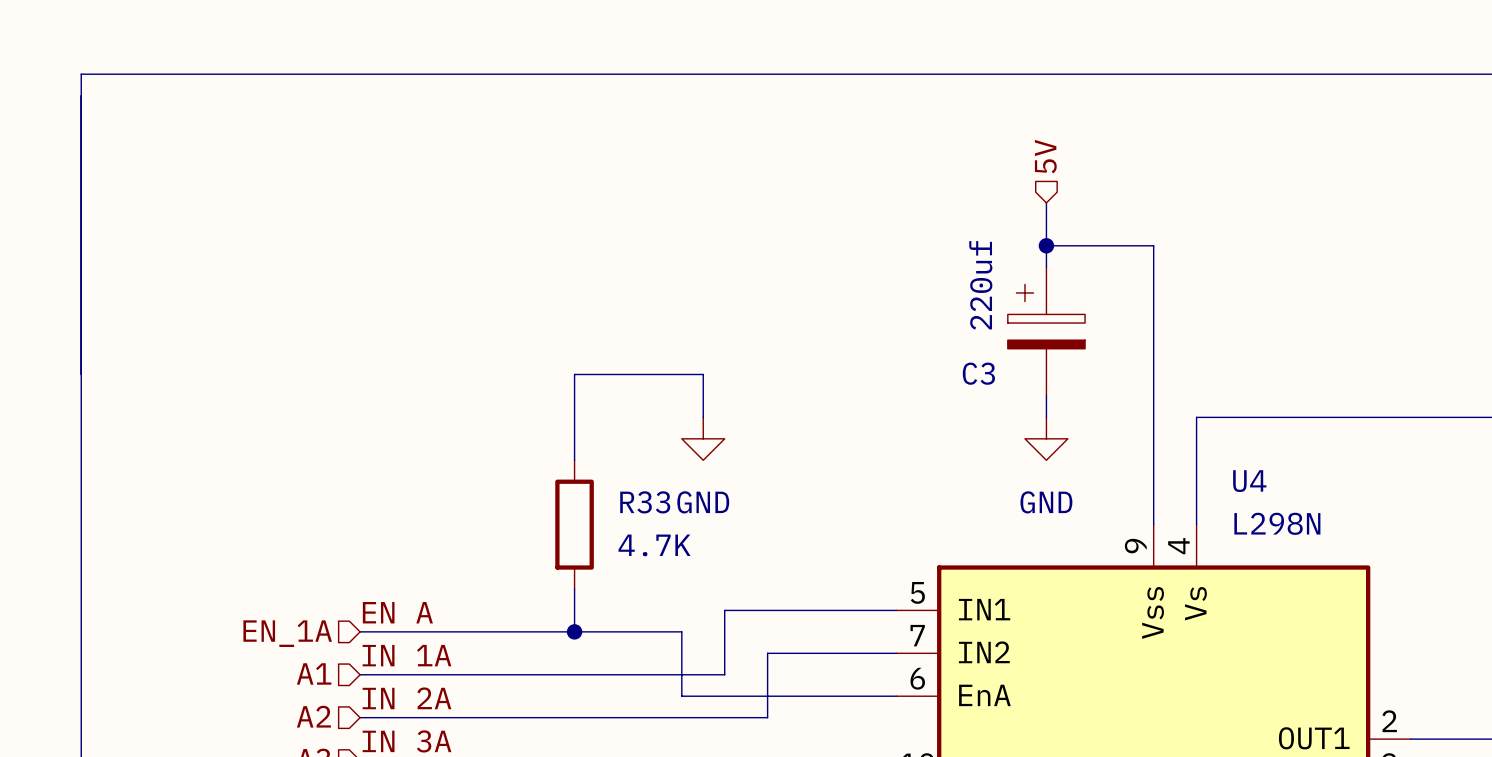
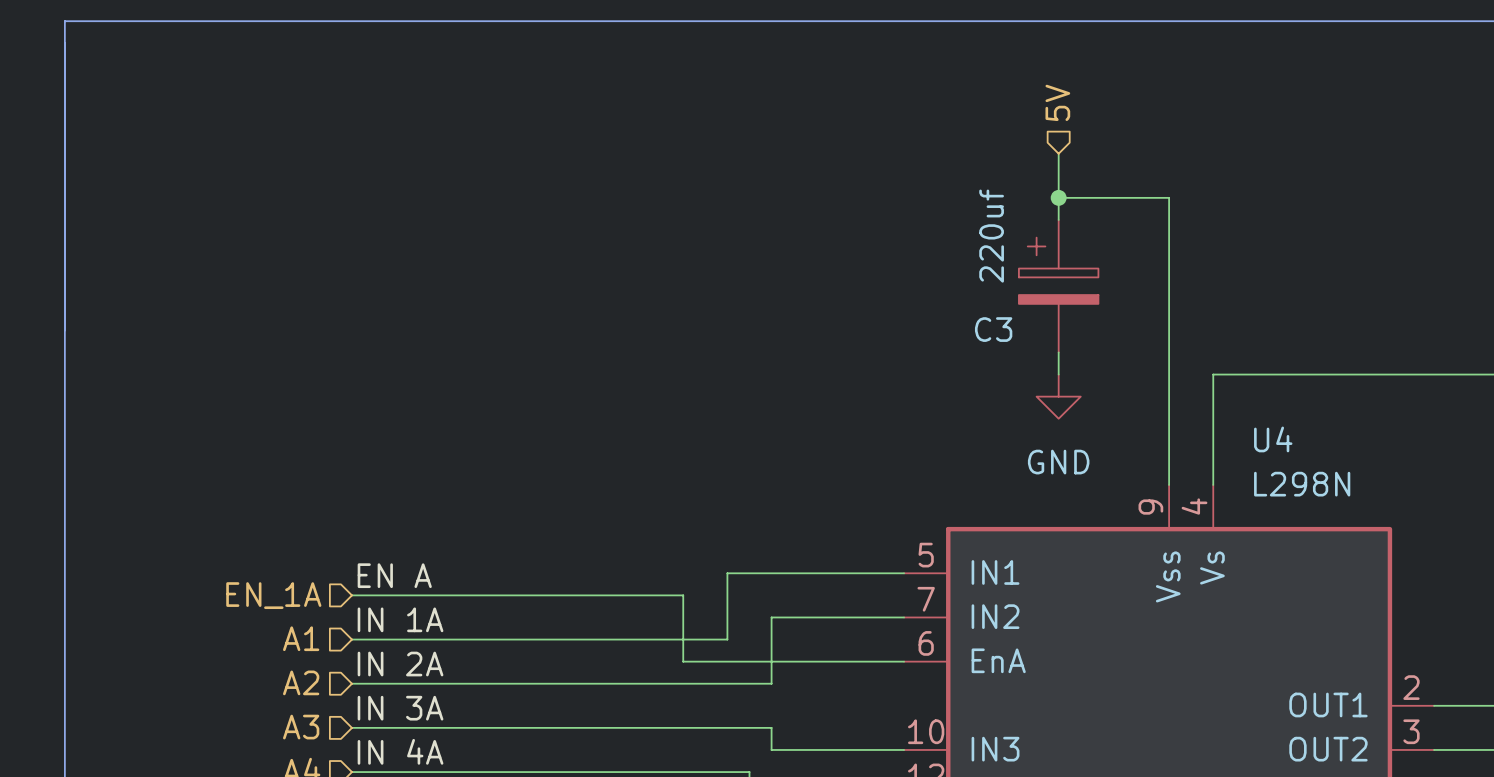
wire: (703, 417) (703, 374) (574, 374) (574, 460) -> none
power symbol: GND (703, 438) -> none
R33: 4.7K (574, 524) -> none
wire: (574, 588) (574, 631) -> none
junction: (574, 631) -> none

